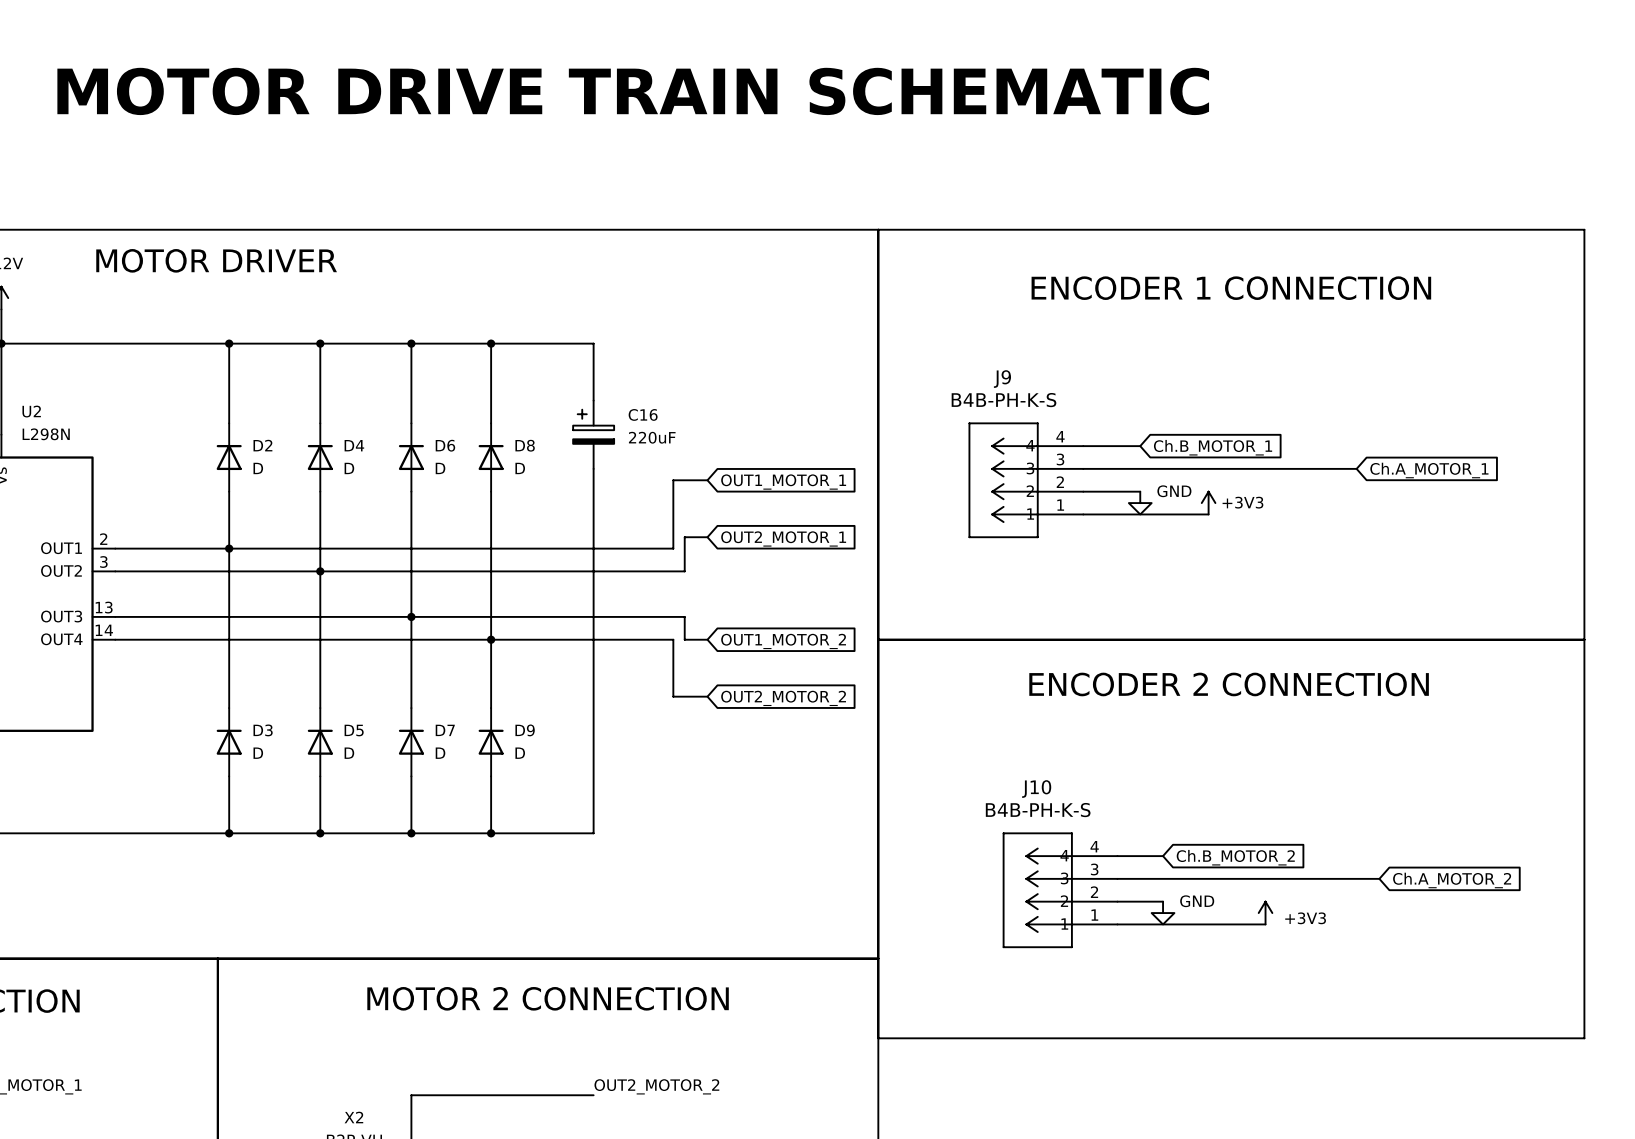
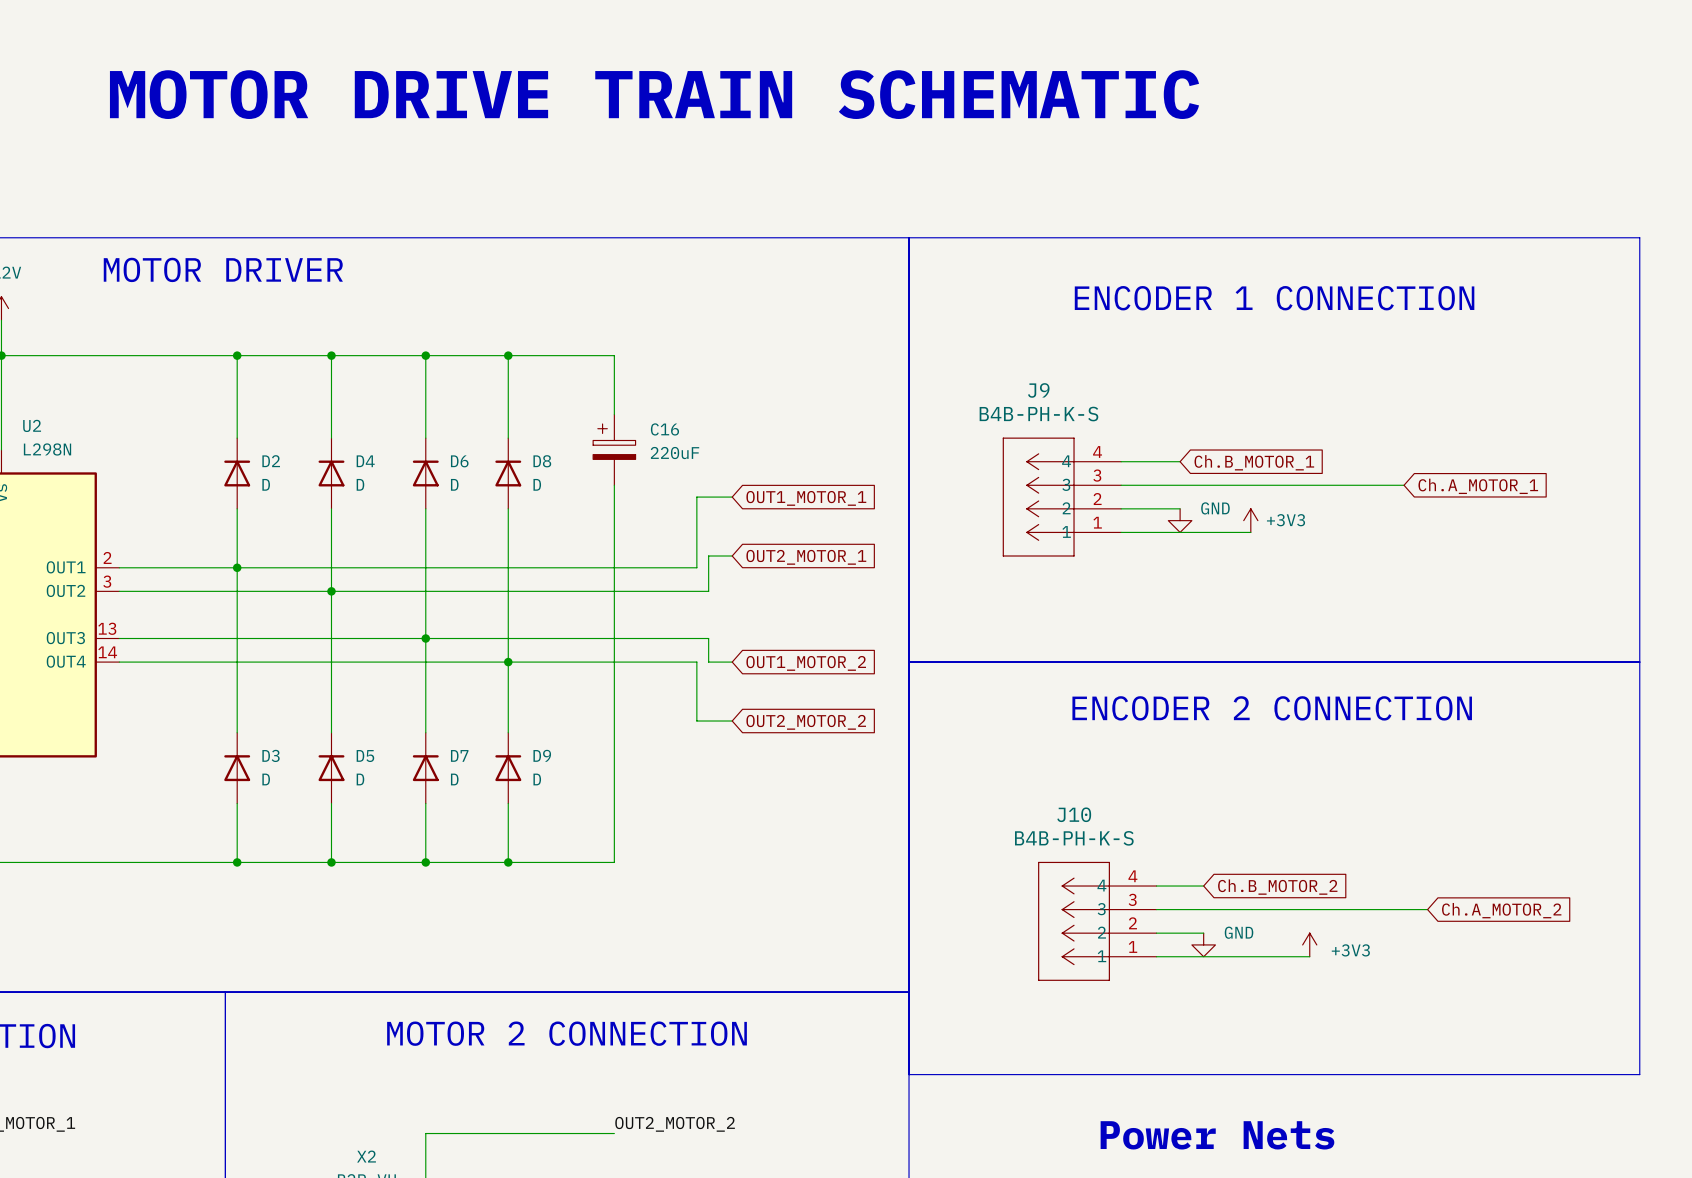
text: none -> Power Nets (1217, 1135)

